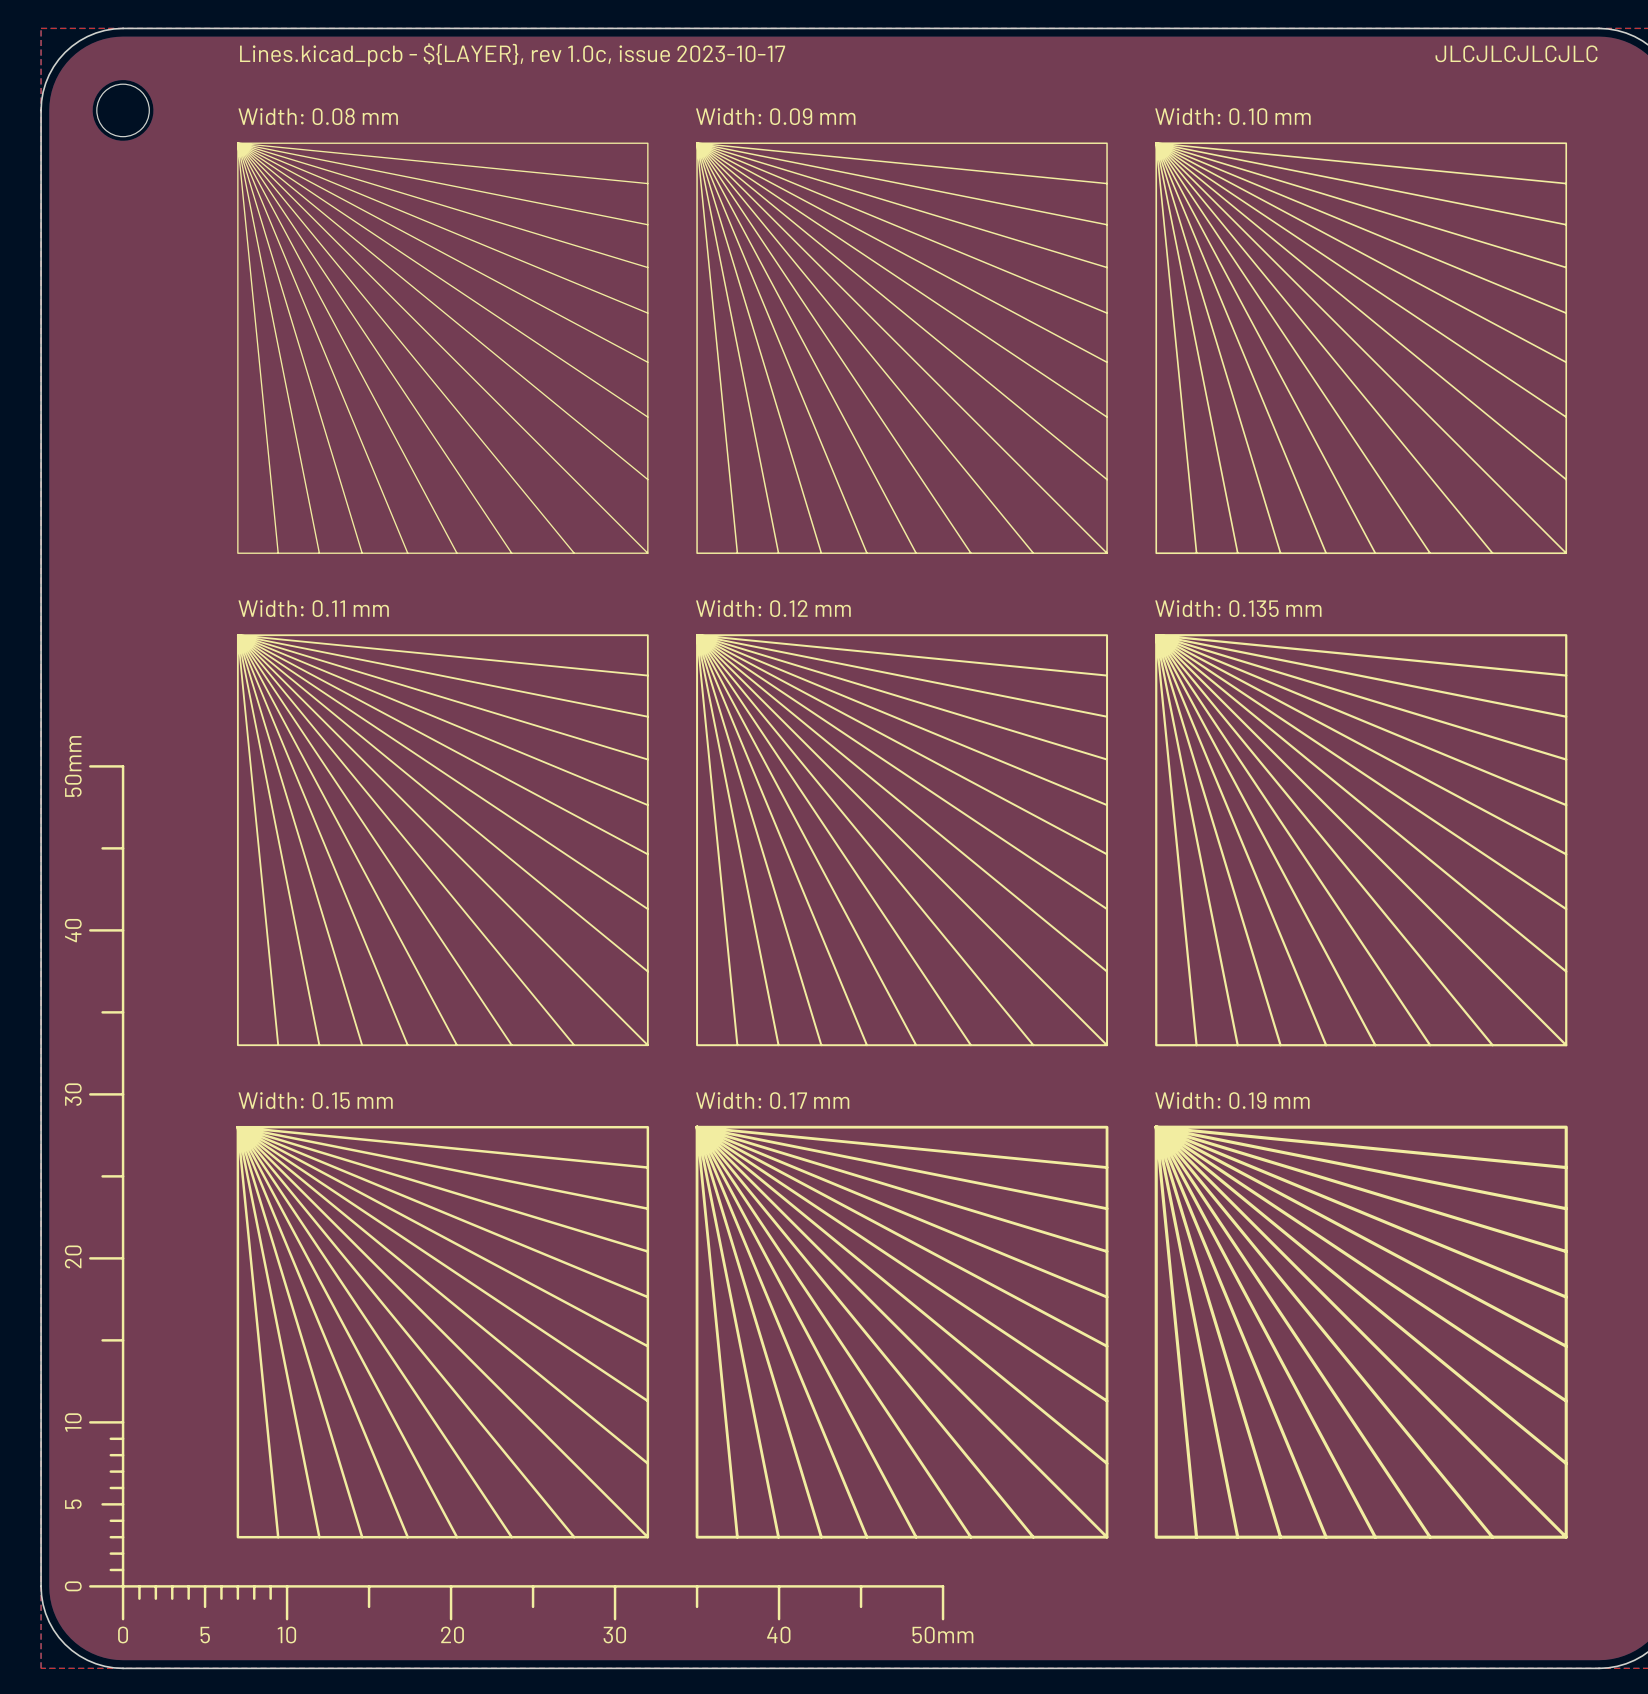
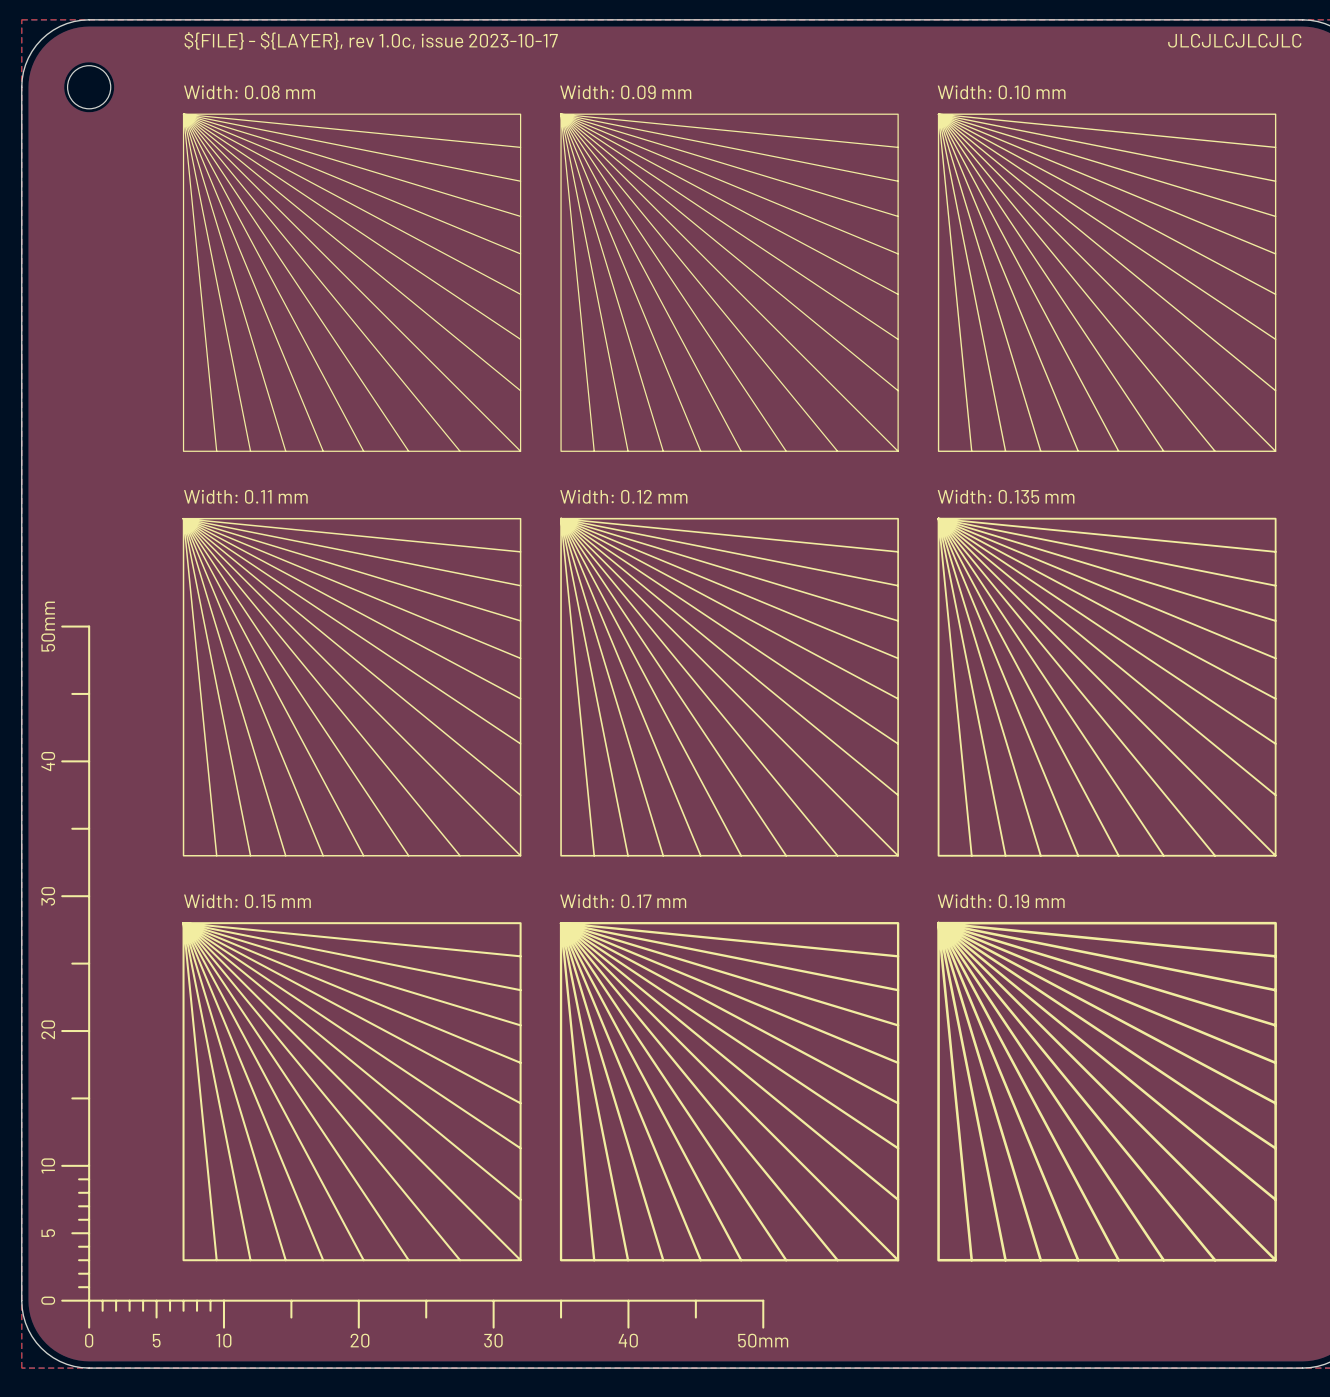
text: Lines.kicad_pcb - ${LAYER}, rev 1.0c, issue 2023-10-17 (512, 54) -> ${FILE} - ${LAYER}, rev 1.0c, issue 2023-10-17 (371, 40)

